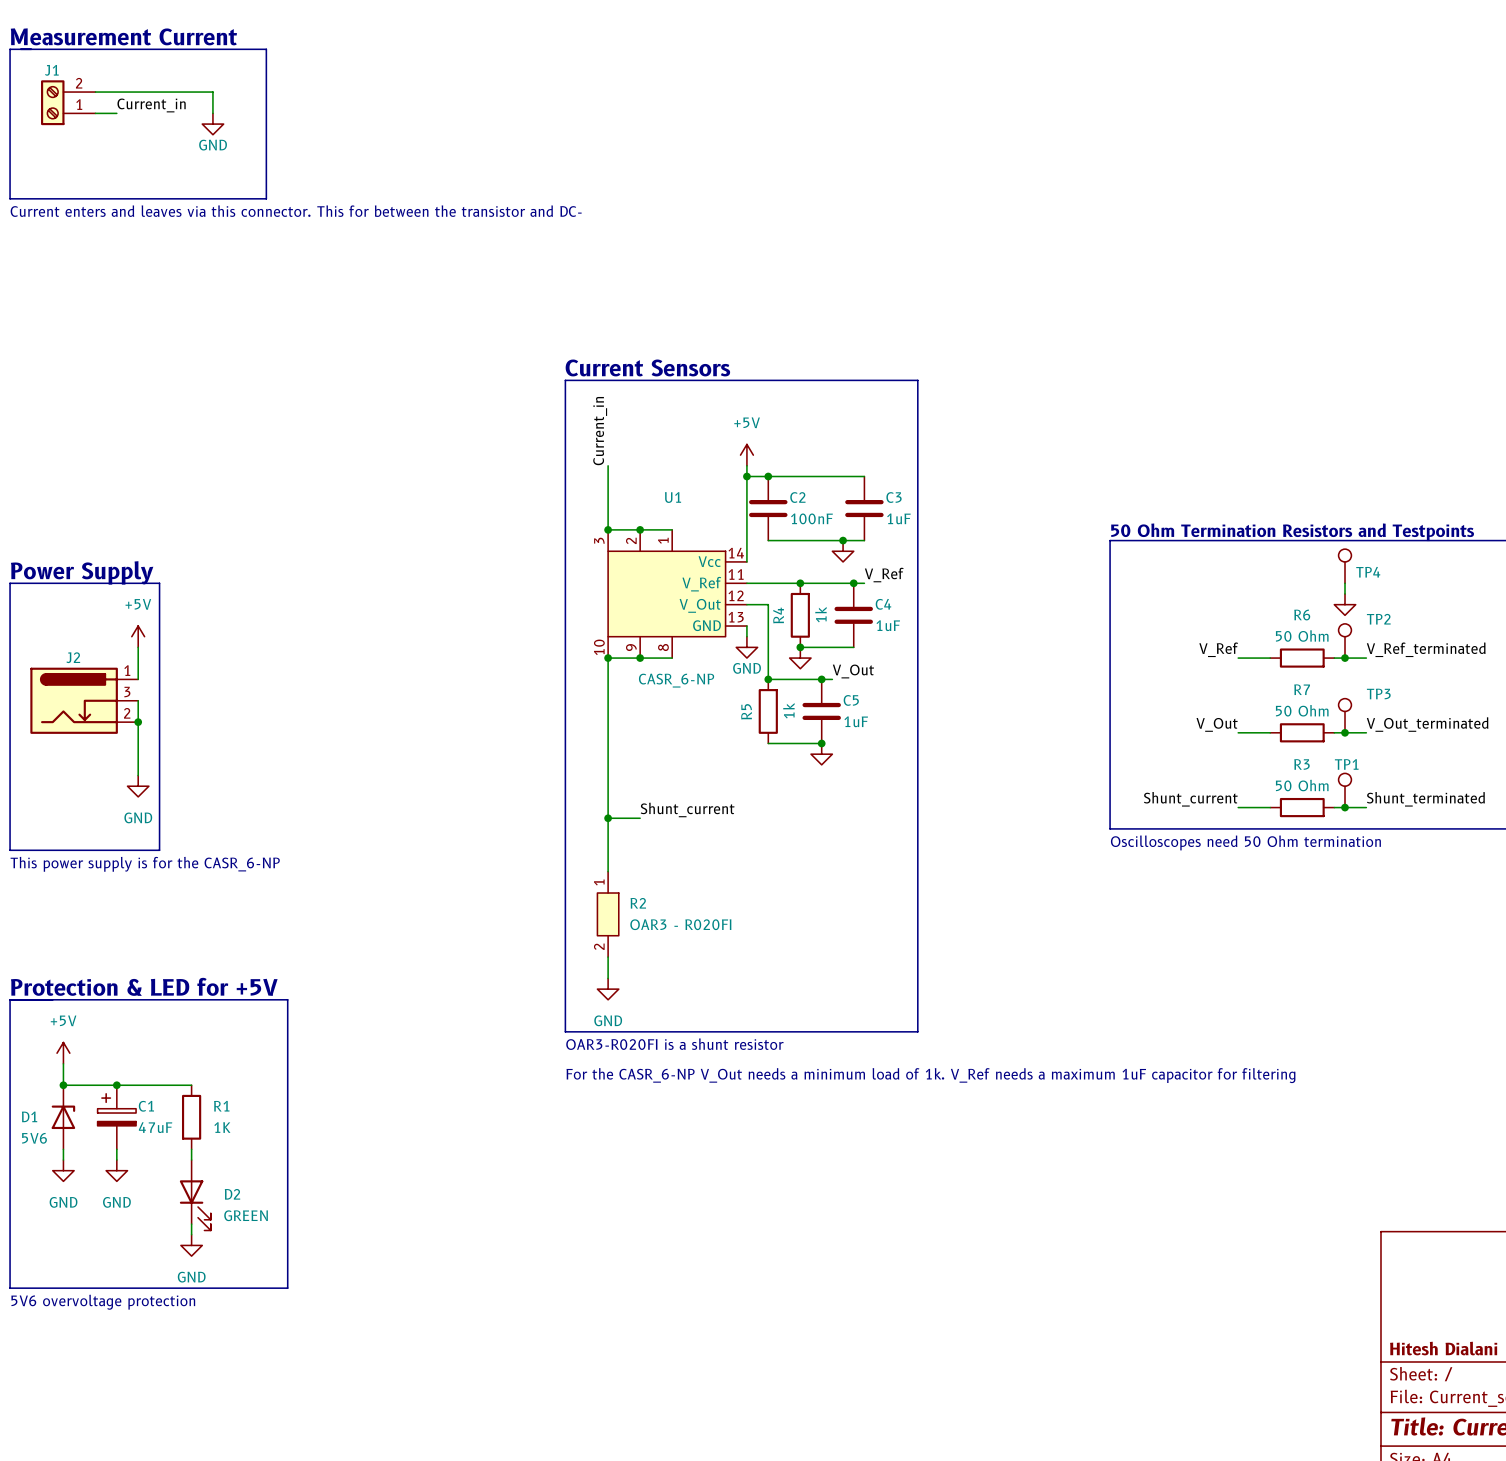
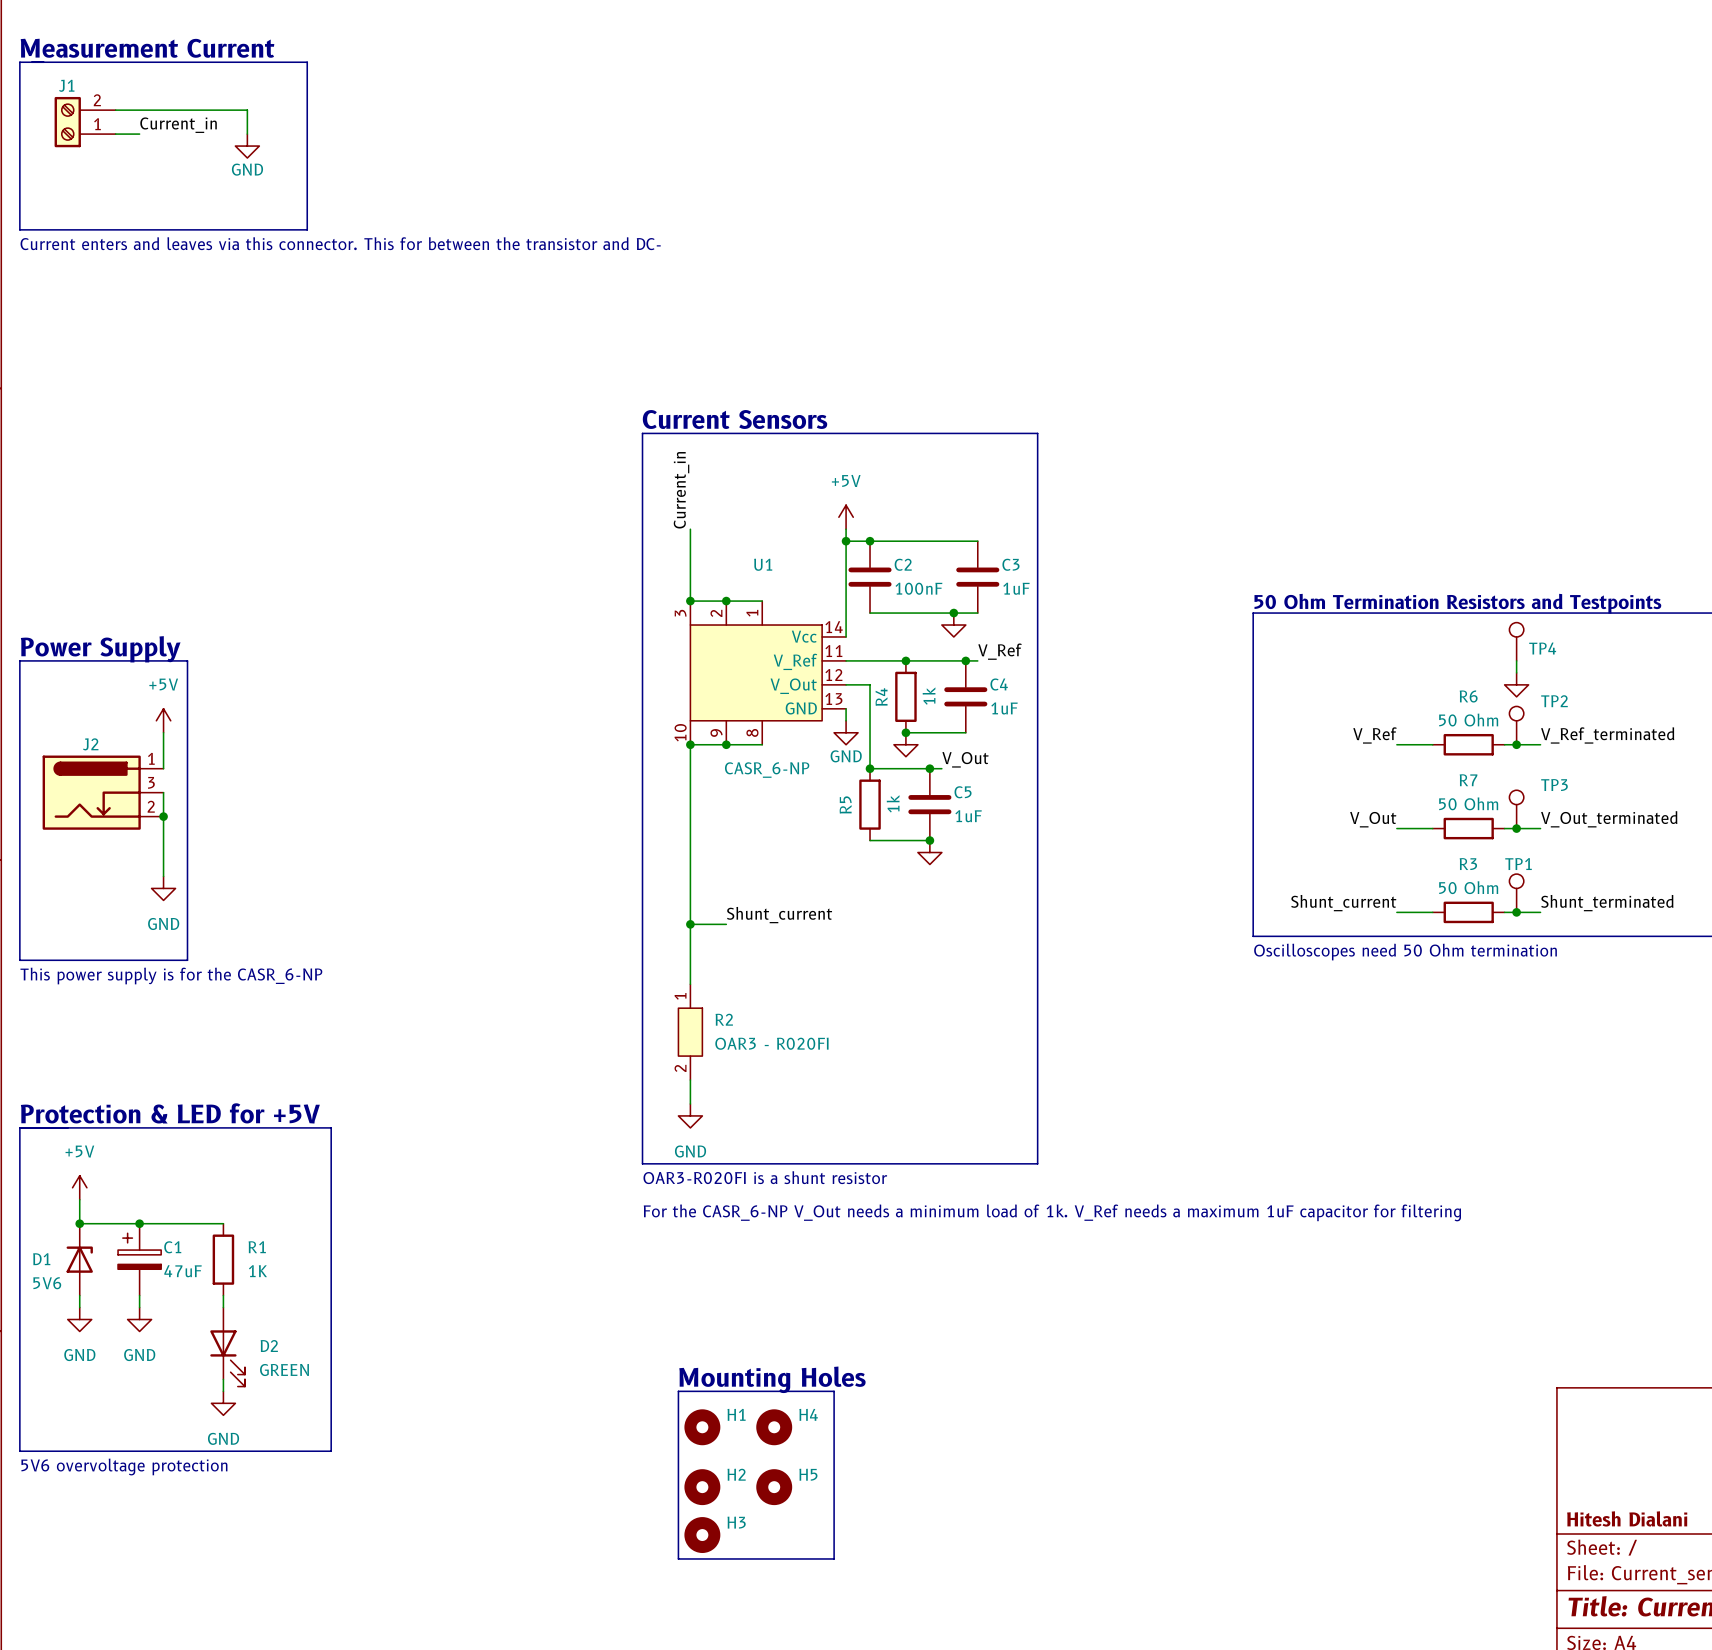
text: none -> Mounting Holes (772, 1379)
line: none -> (678, 1391) (834, 1391) (834, 1558) (678, 1558) (678, 1391)
H1: none -> (702, 1427)
H4: none -> (774, 1427)
H2: none -> (702, 1487)
H5: none -> (774, 1487)
H3: none -> (702, 1535)

